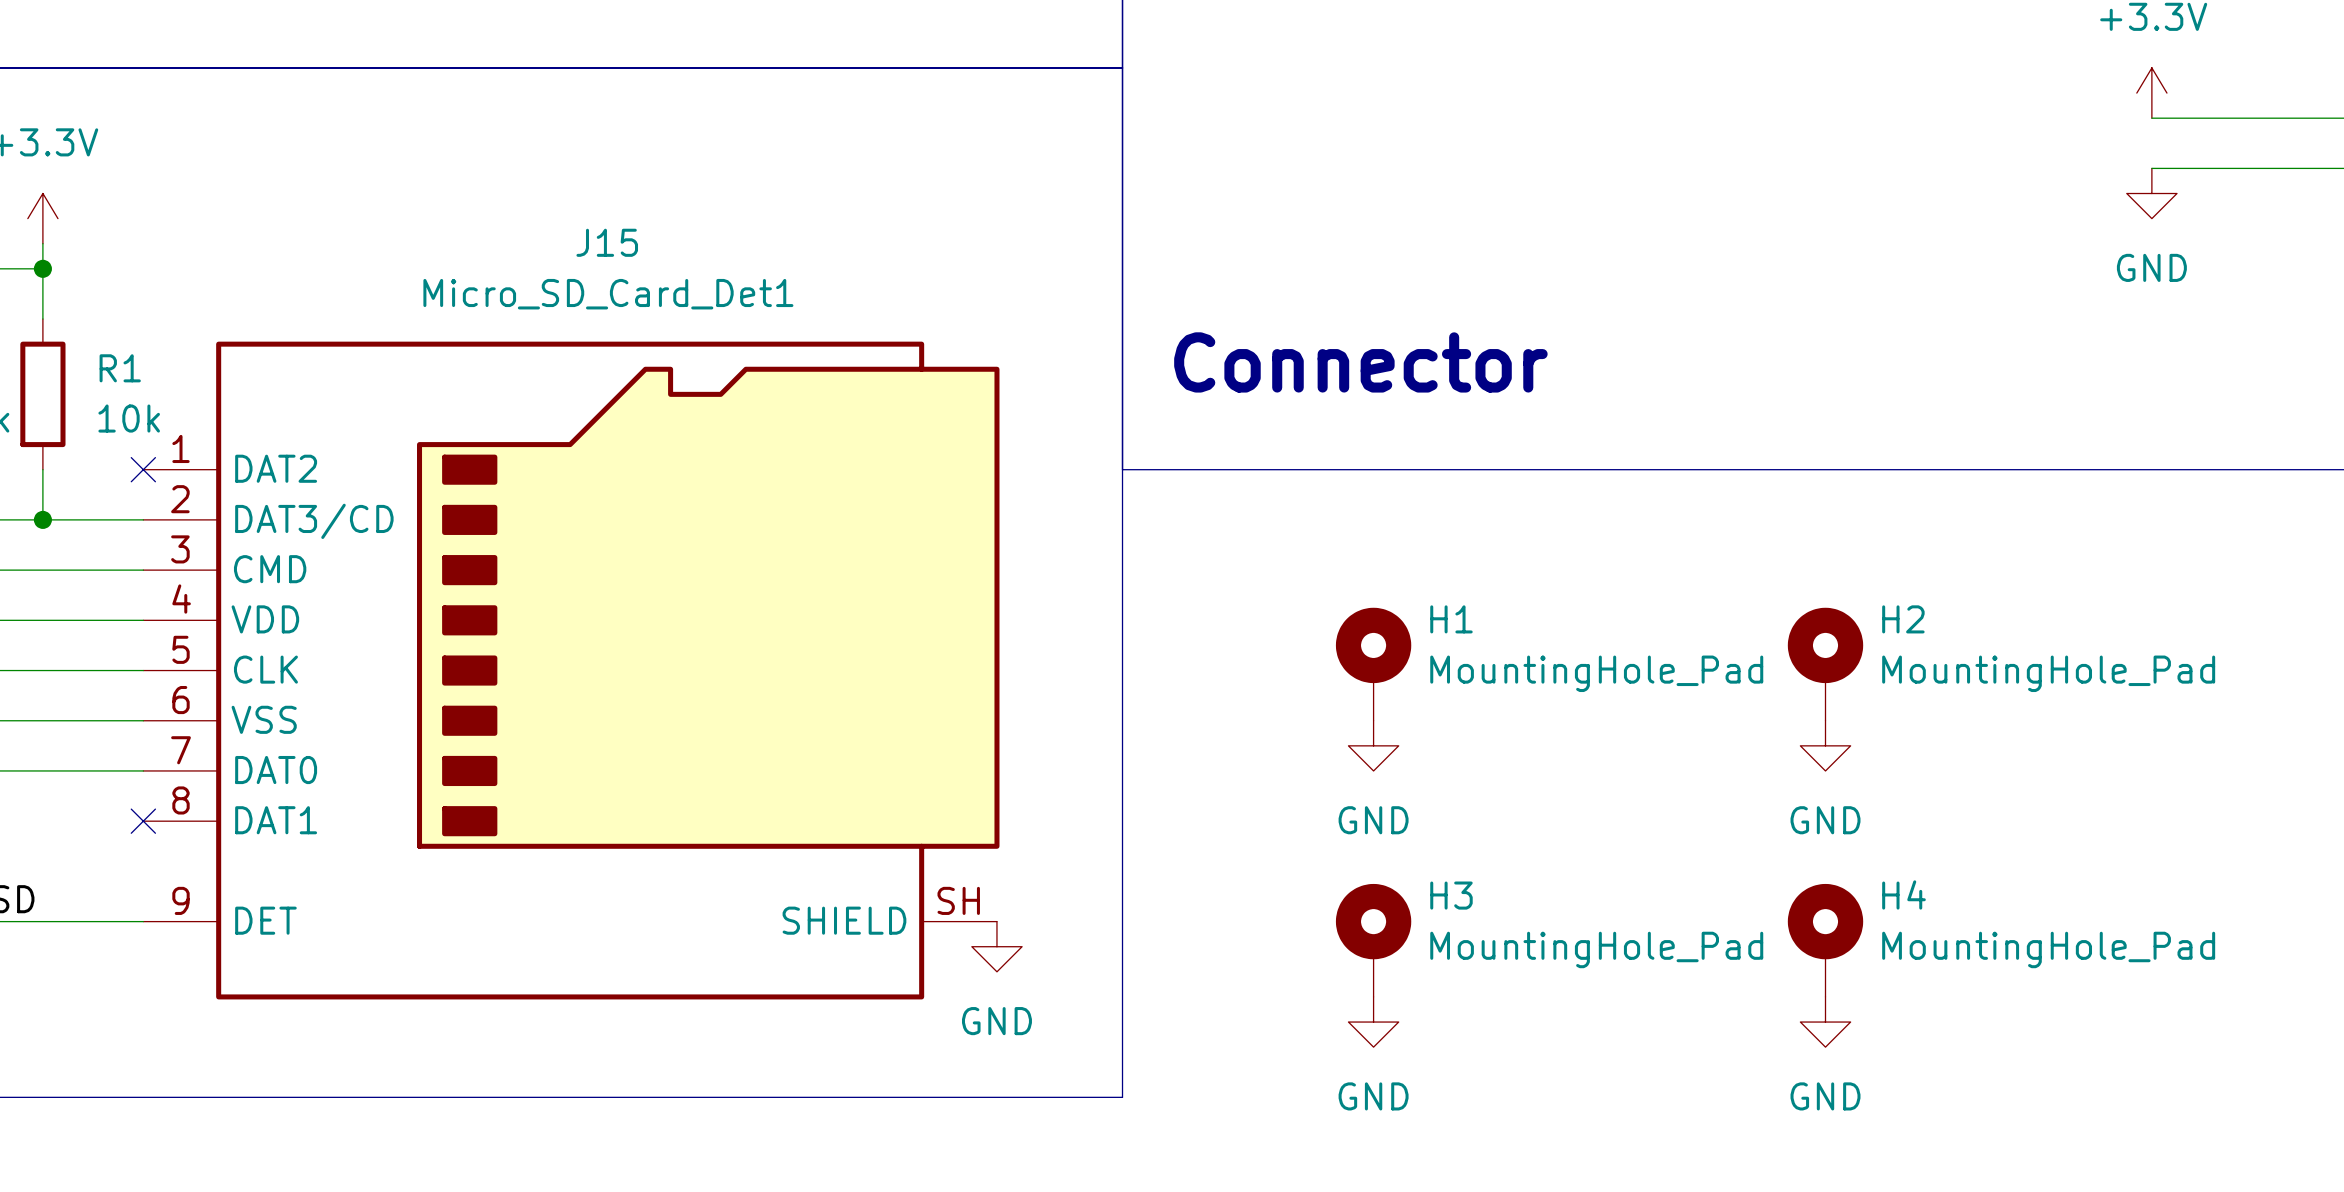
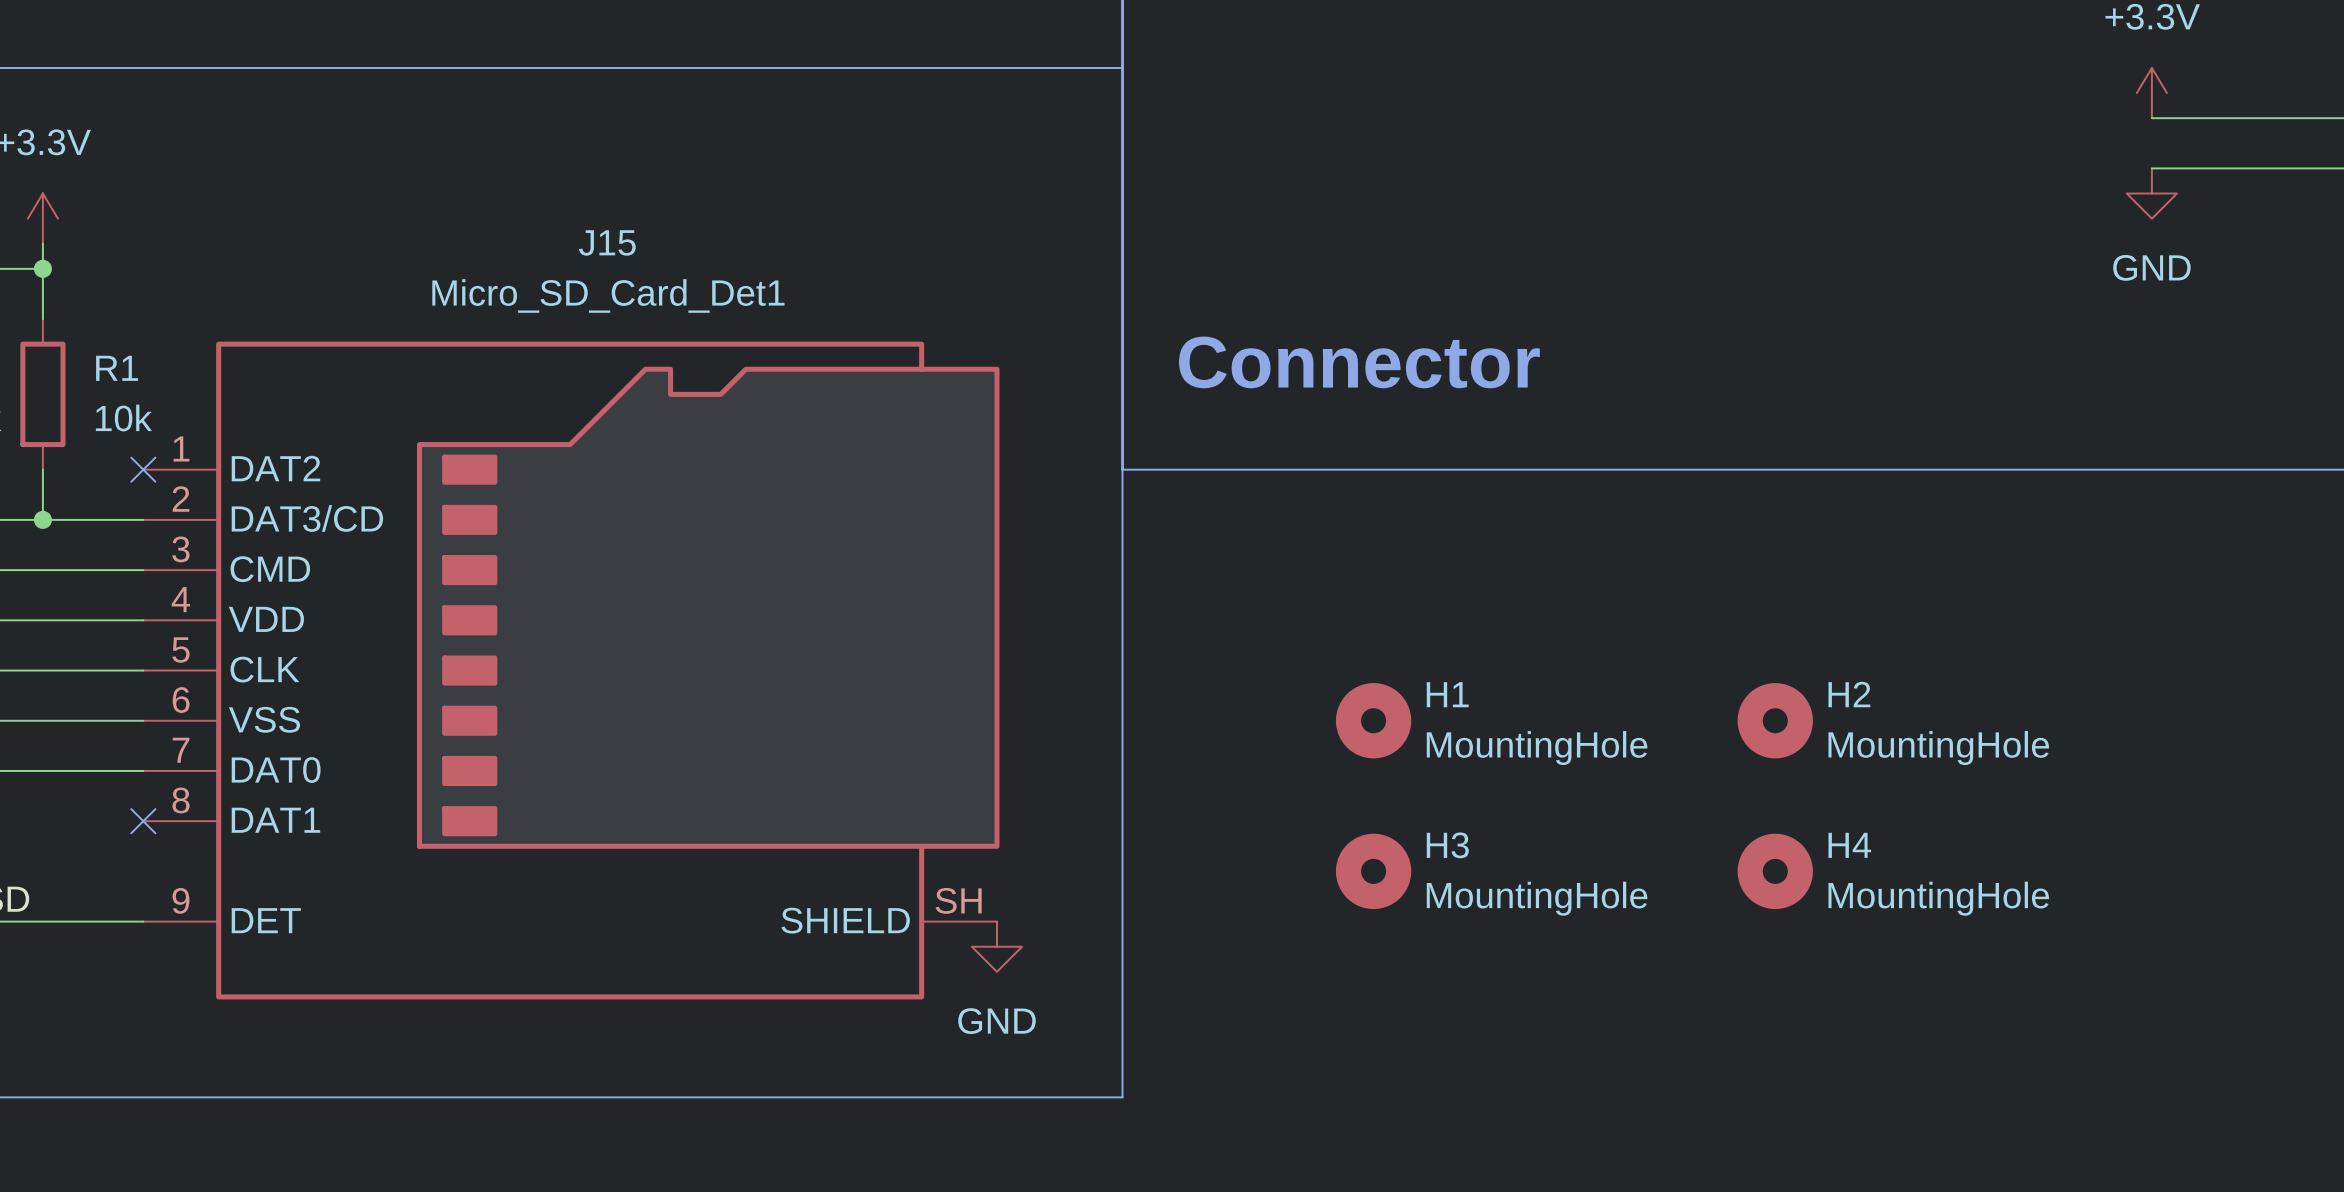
H1 symbol: [1335, 607, 1412, 721] -> [1335, 683, 1412, 759]
H2 symbol: [1787, 607, 1864, 721] -> [1737, 683, 1813, 759]
H1 value: MountingHole_Pad (1596, 673) -> MountingHole (1537, 748)
H2 value: MountingHole_Pad (2048, 673) -> MountingHole (1938, 748)
power symbol: GND (1373, 745) -> none
power symbol: GND (1825, 745) -> none
H3 symbol: [1335, 883, 1412, 997] -> [1335, 833, 1412, 910]
H4 symbol: [1787, 883, 1864, 997] -> [1737, 833, 1813, 910]
H3 value: MountingHole_Pad (1596, 949) -> MountingHole (1537, 898)
H4 value: MountingHole_Pad (2048, 949) -> MountingHole (1938, 898)
power symbol: GND (1373, 1022) -> none
power symbol: GND (1825, 1022) -> none

